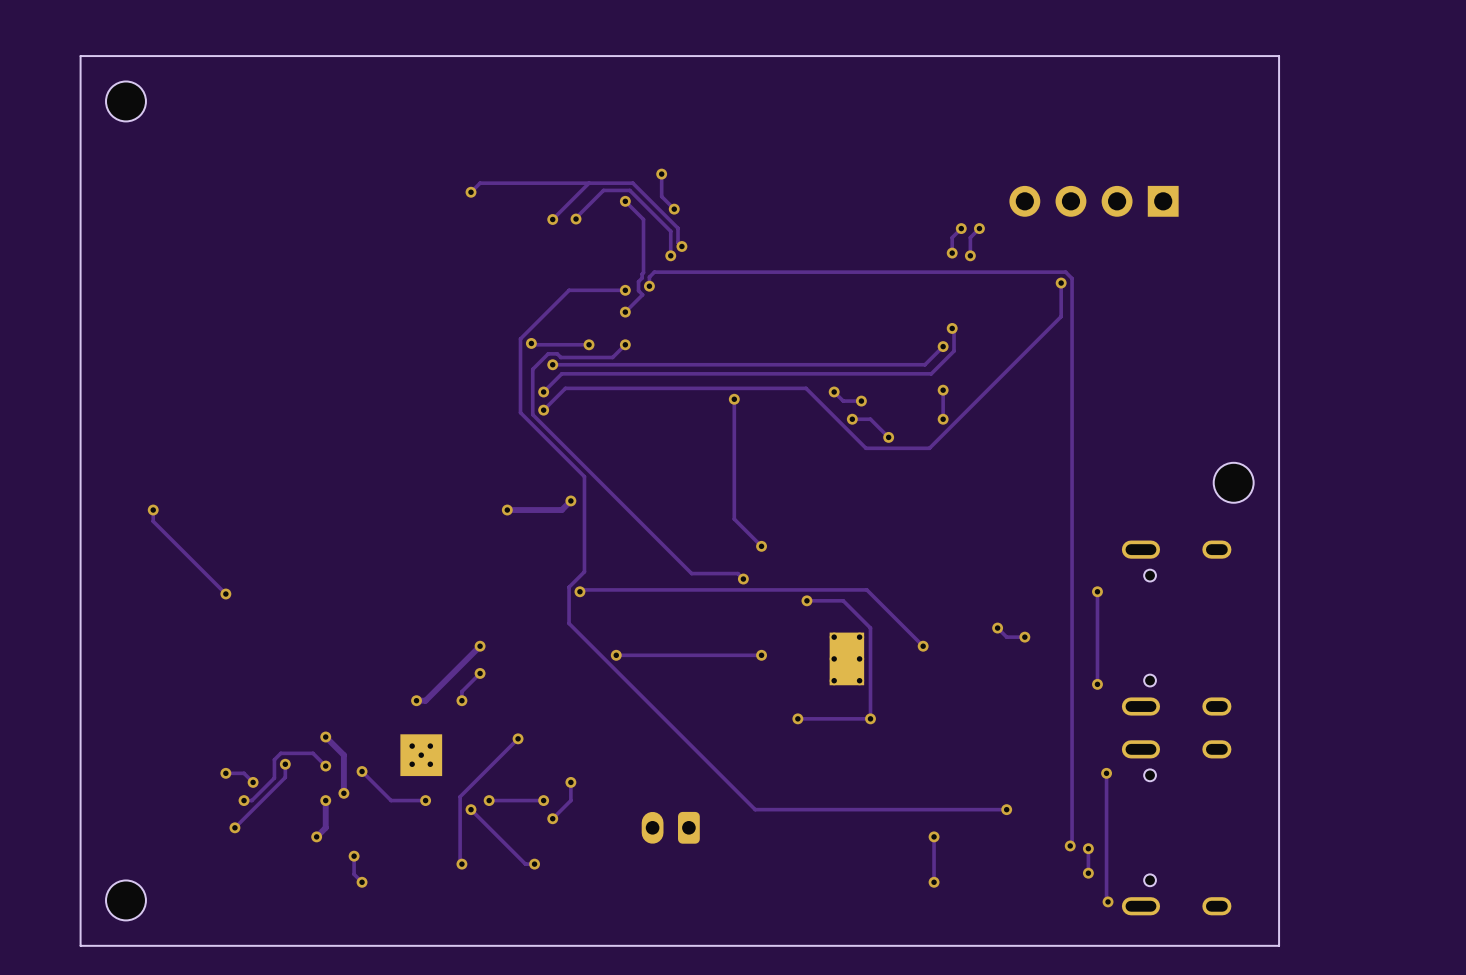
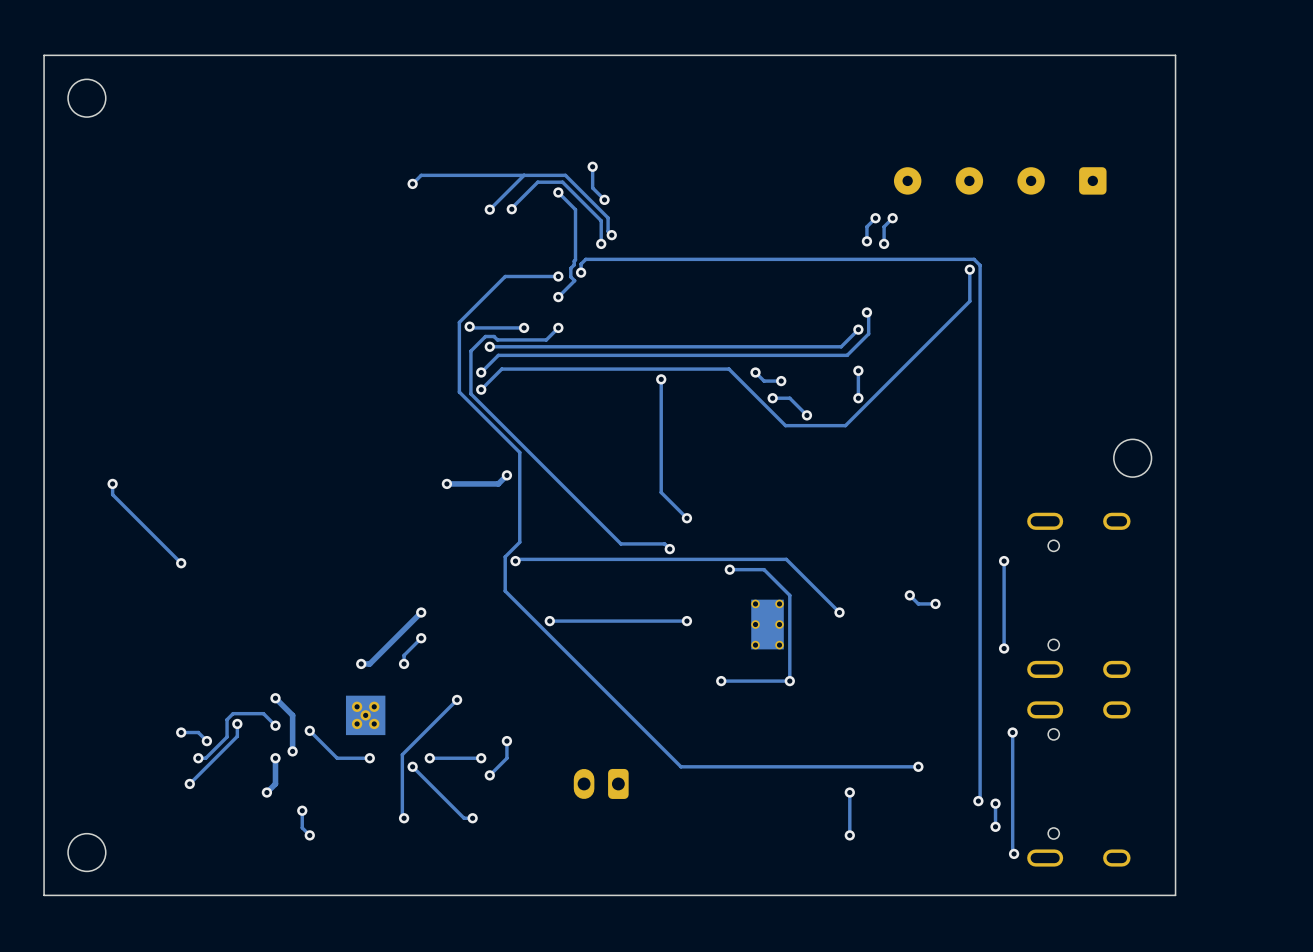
part footprint: [1009, 185, 1179, 217] -> [893, 167, 1107, 195]

